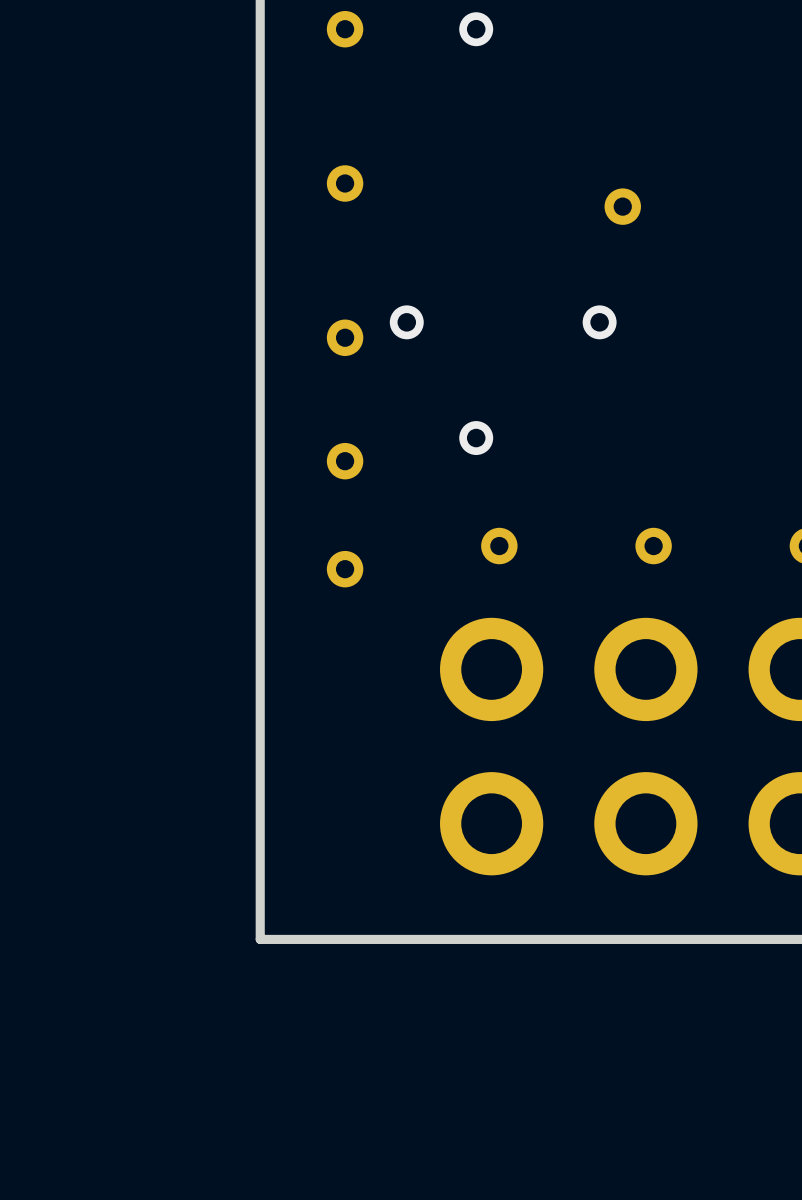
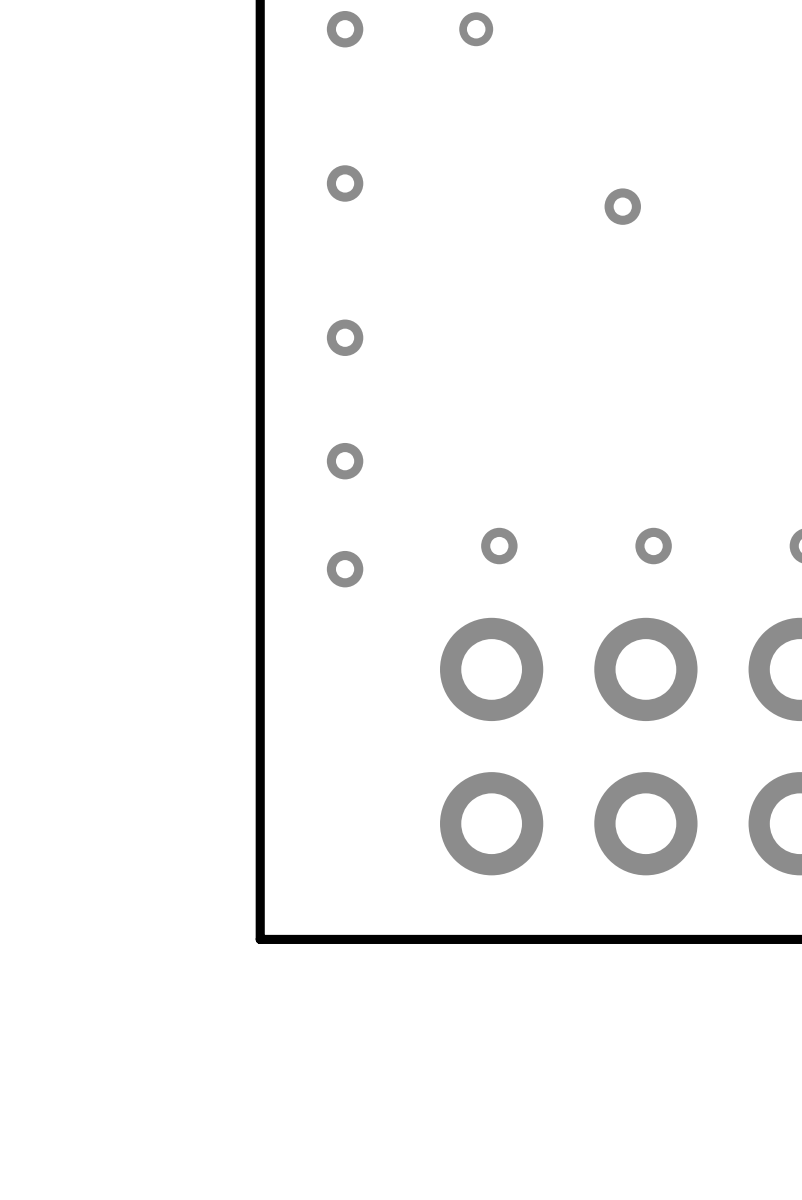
via: (406, 322) -> none
via: (599, 322) -> none
via: (476, 438) -> none

